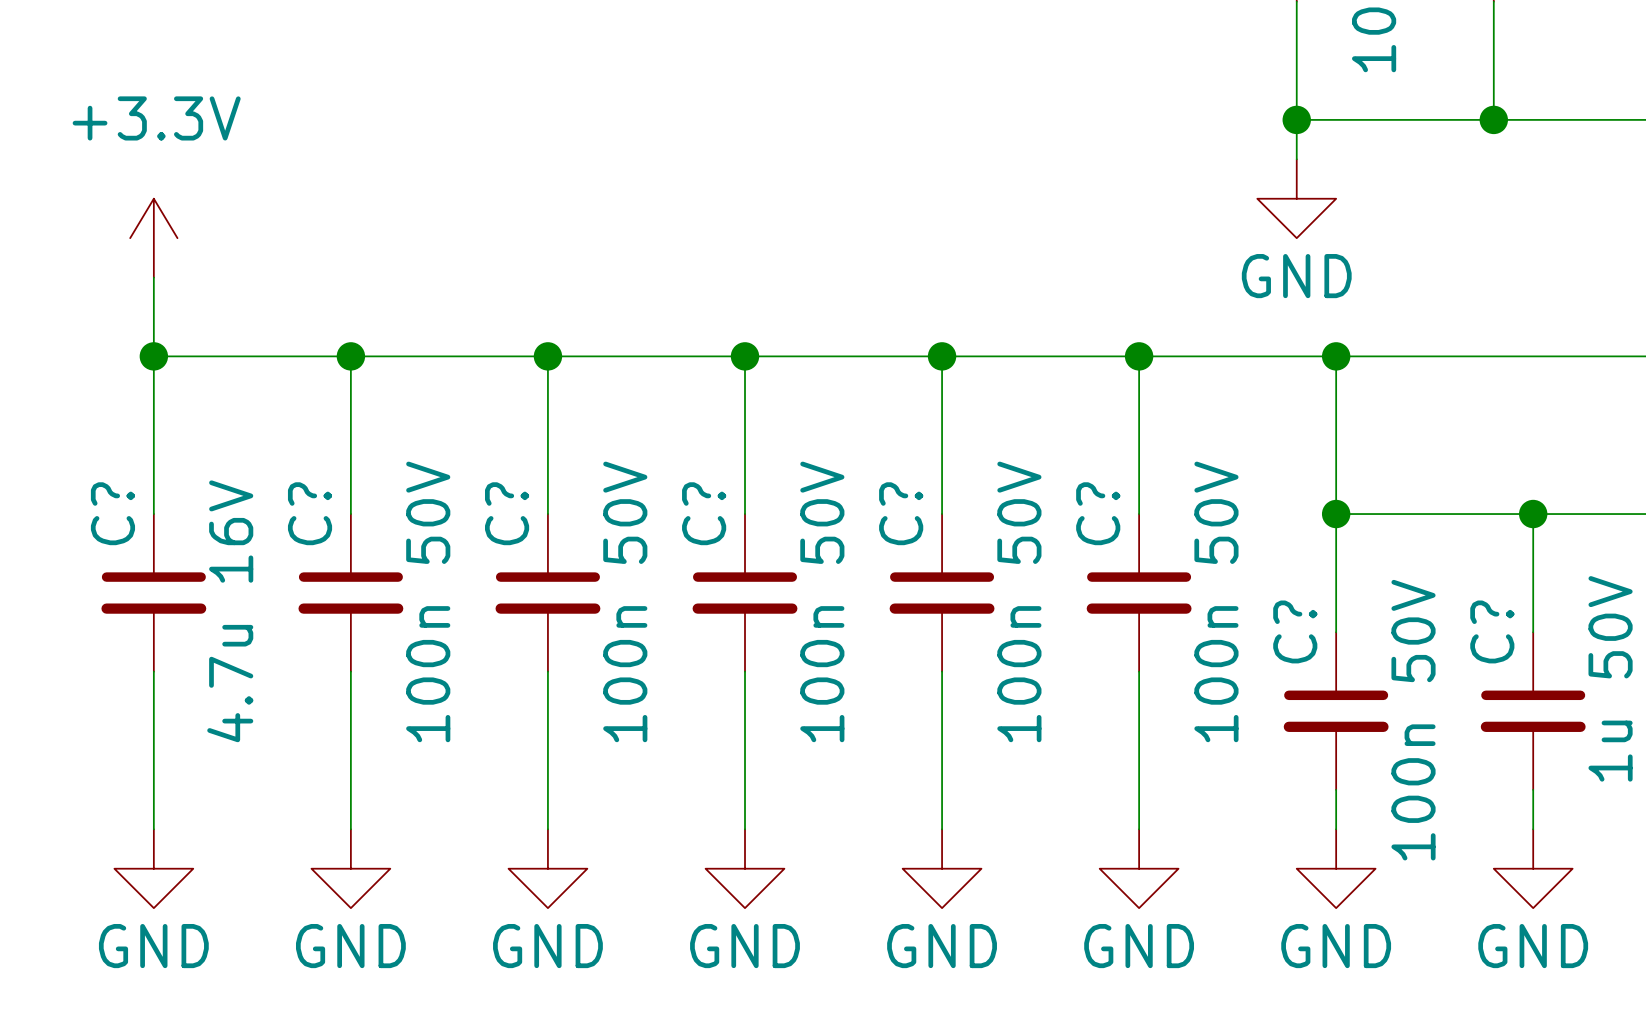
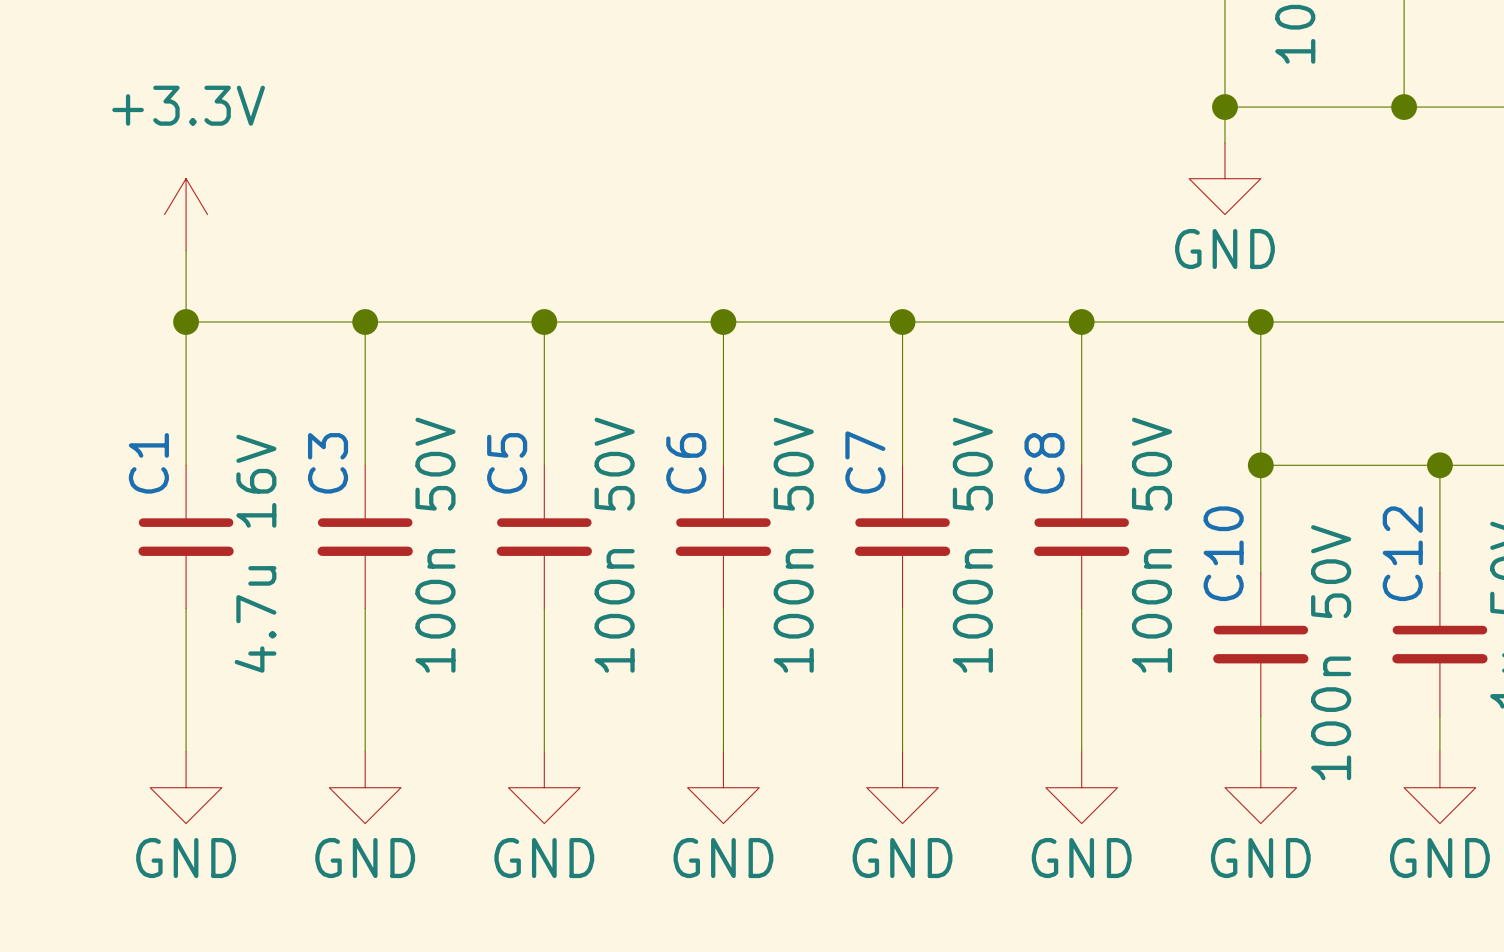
C? name: C? (112, 513) -> C1 (148, 463)
C? name: C? (310, 513) -> C3 (328, 463)
C? name: C? (507, 513) -> C5 (507, 463)
C? name: C? (704, 513) -> C6 (686, 463)
C? name: C? (901, 513) -> C7 (865, 462)
C? name: C? (1098, 513) -> C8 (1044, 463)
C? name: C? (1295, 631) -> C10 (1223, 553)
C? name: C? (1492, 631) -> C12 (1402, 553)

